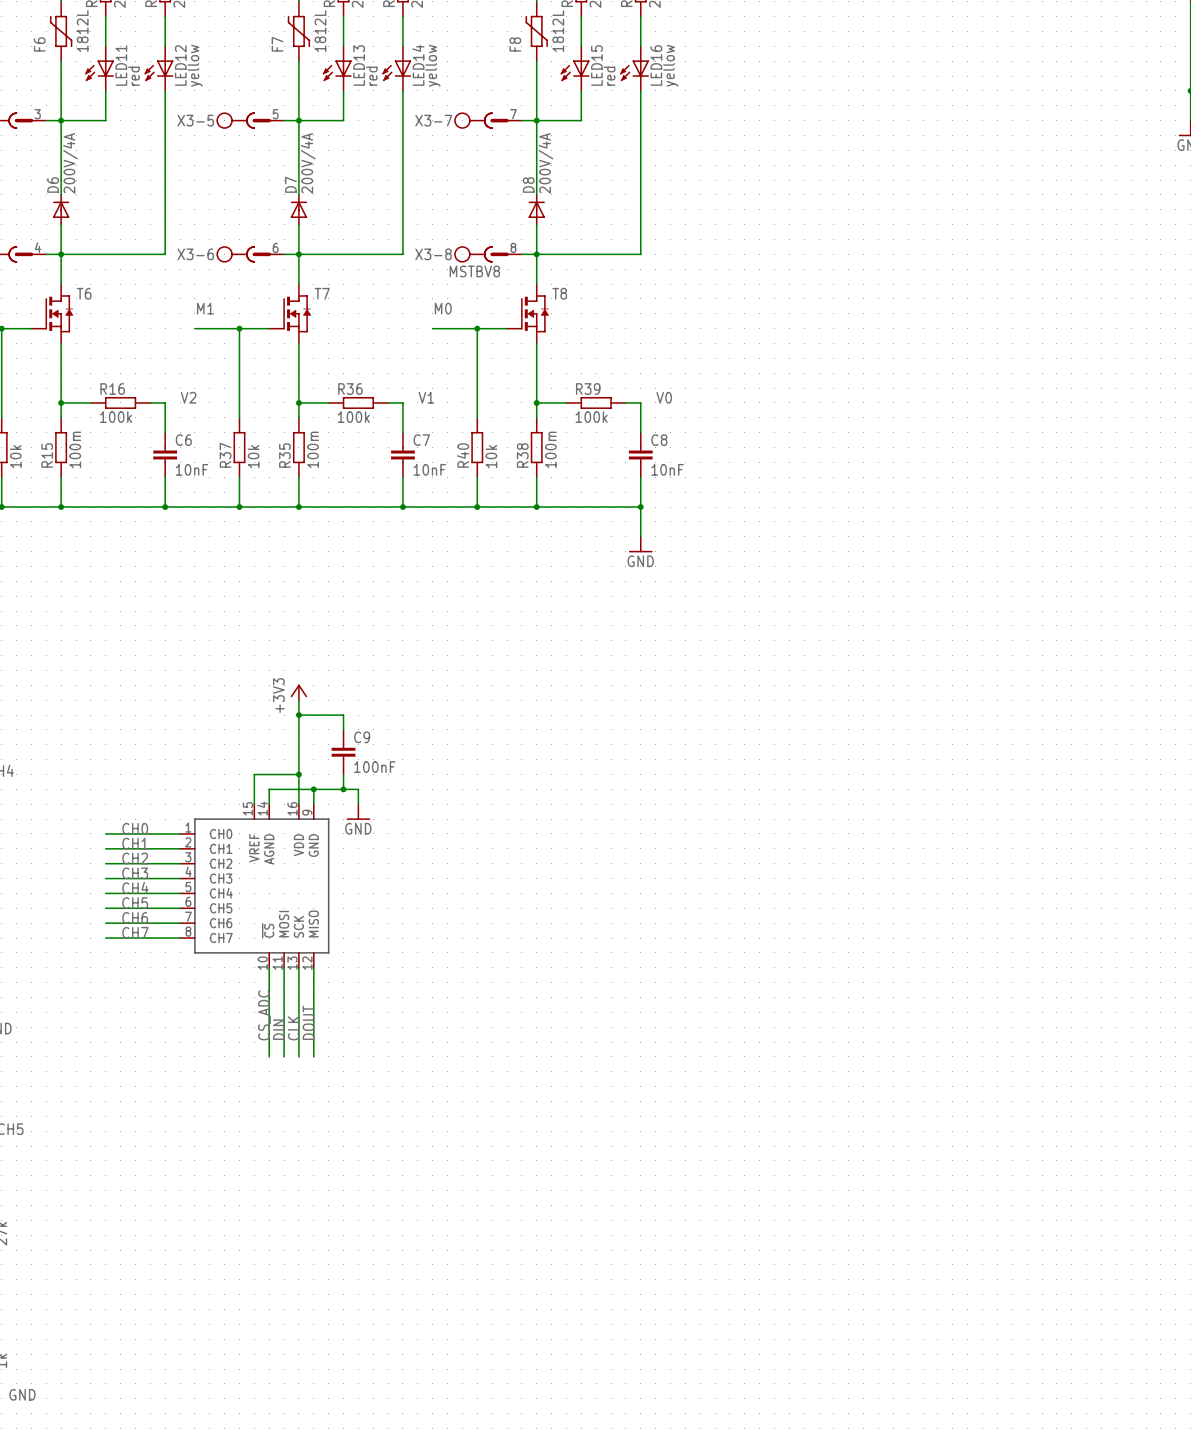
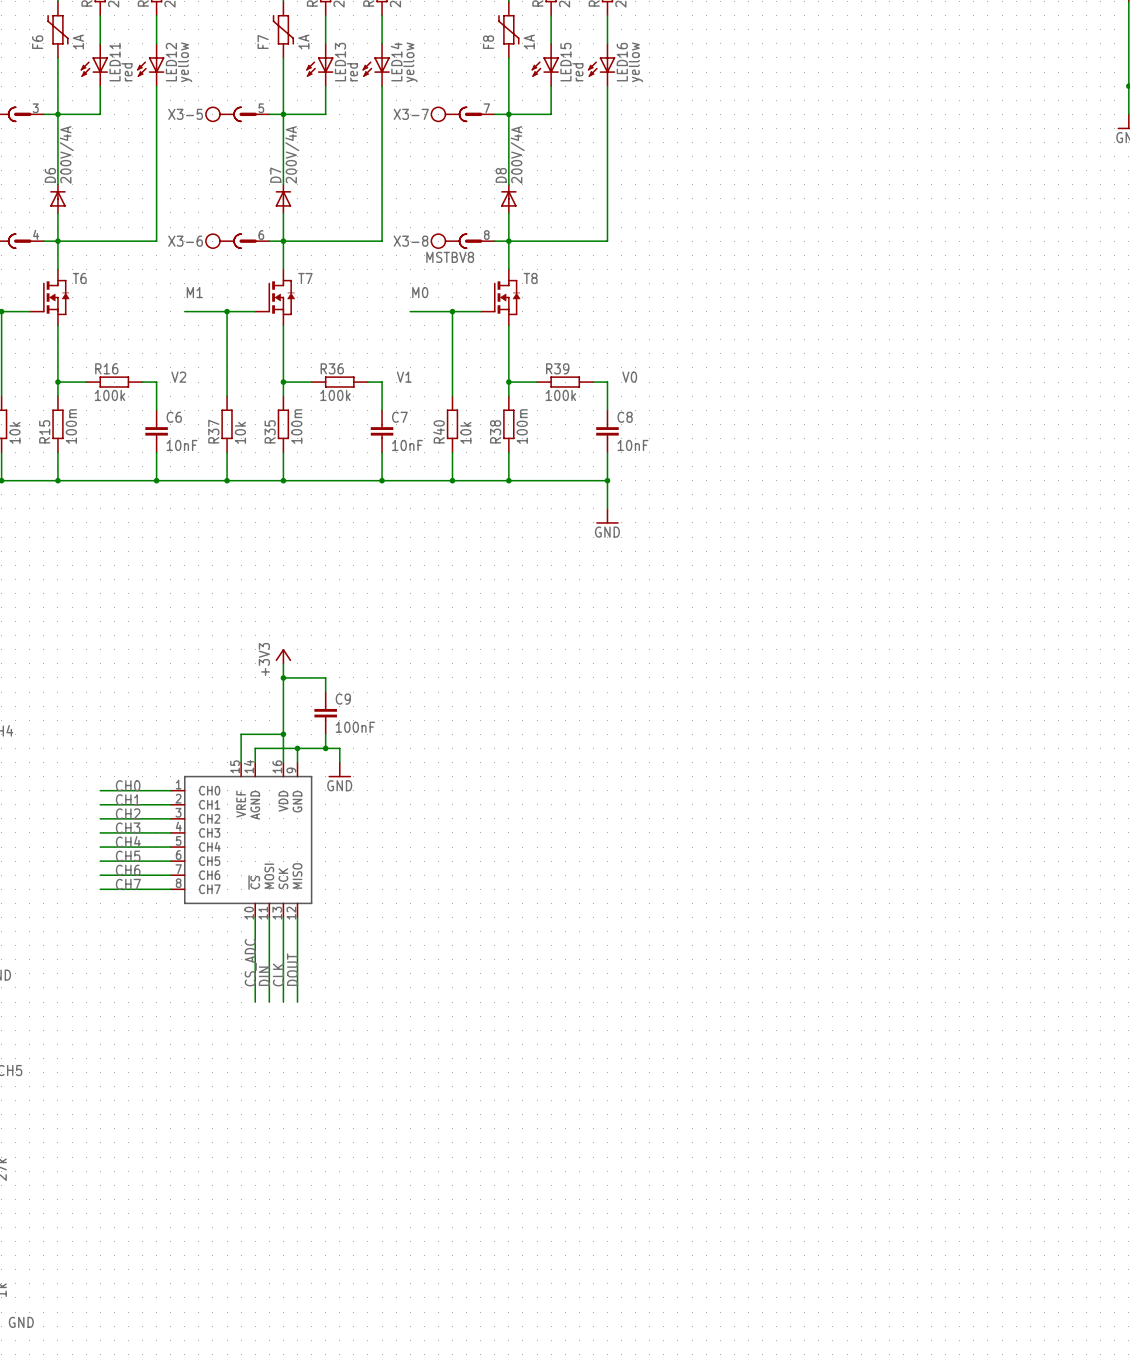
F6 value: 1812L (82, 31) -> 1A (78, 41)
F7 value: 1812L (320, 31) -> 1A (303, 41)
F8 value: 1812L (558, 31) -> 1A (529, 41)

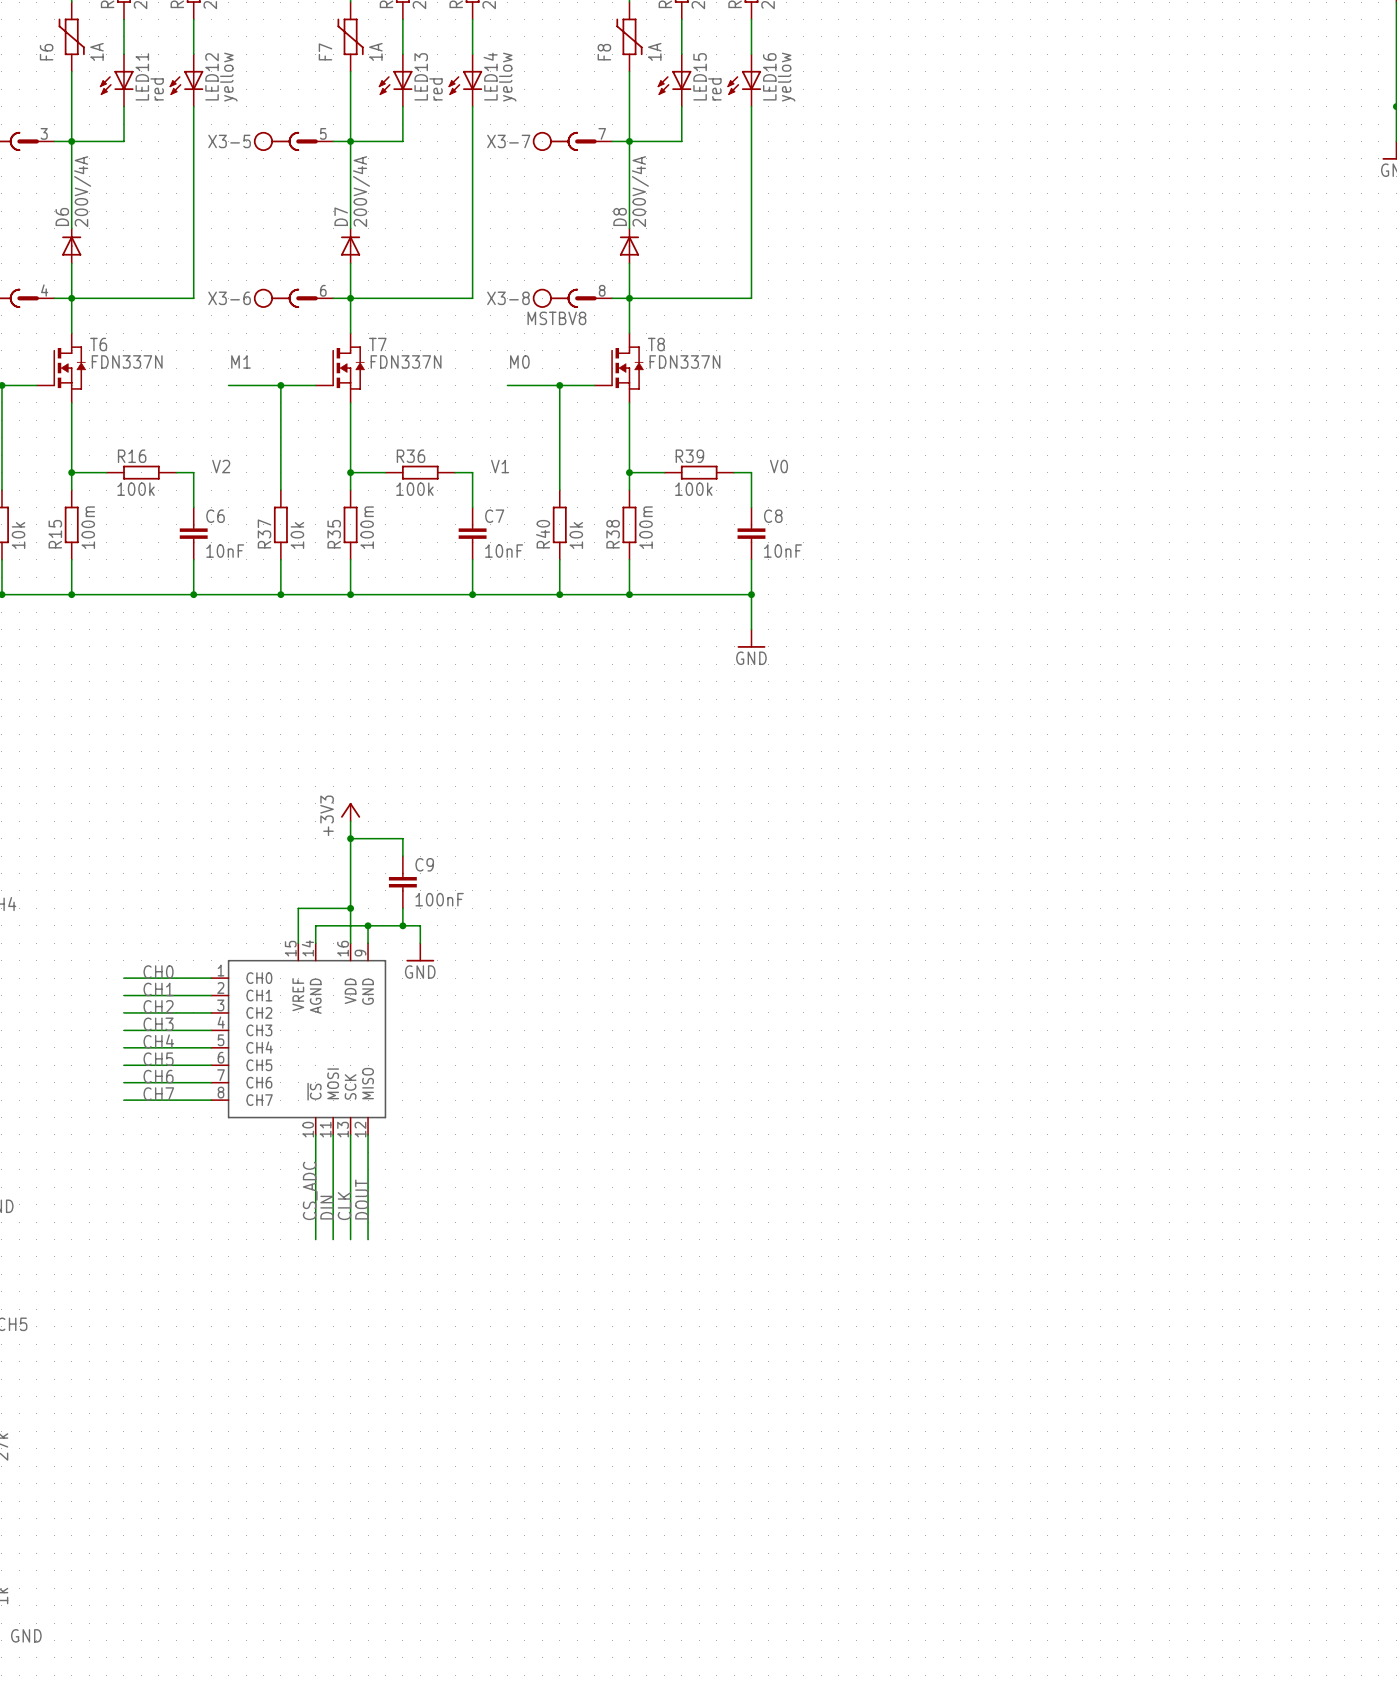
T6 value: none -> FDN337N (127, 361)
T7 value: none -> FDN337N (406, 361)
T8 value: none -> FDN337N (684, 361)

